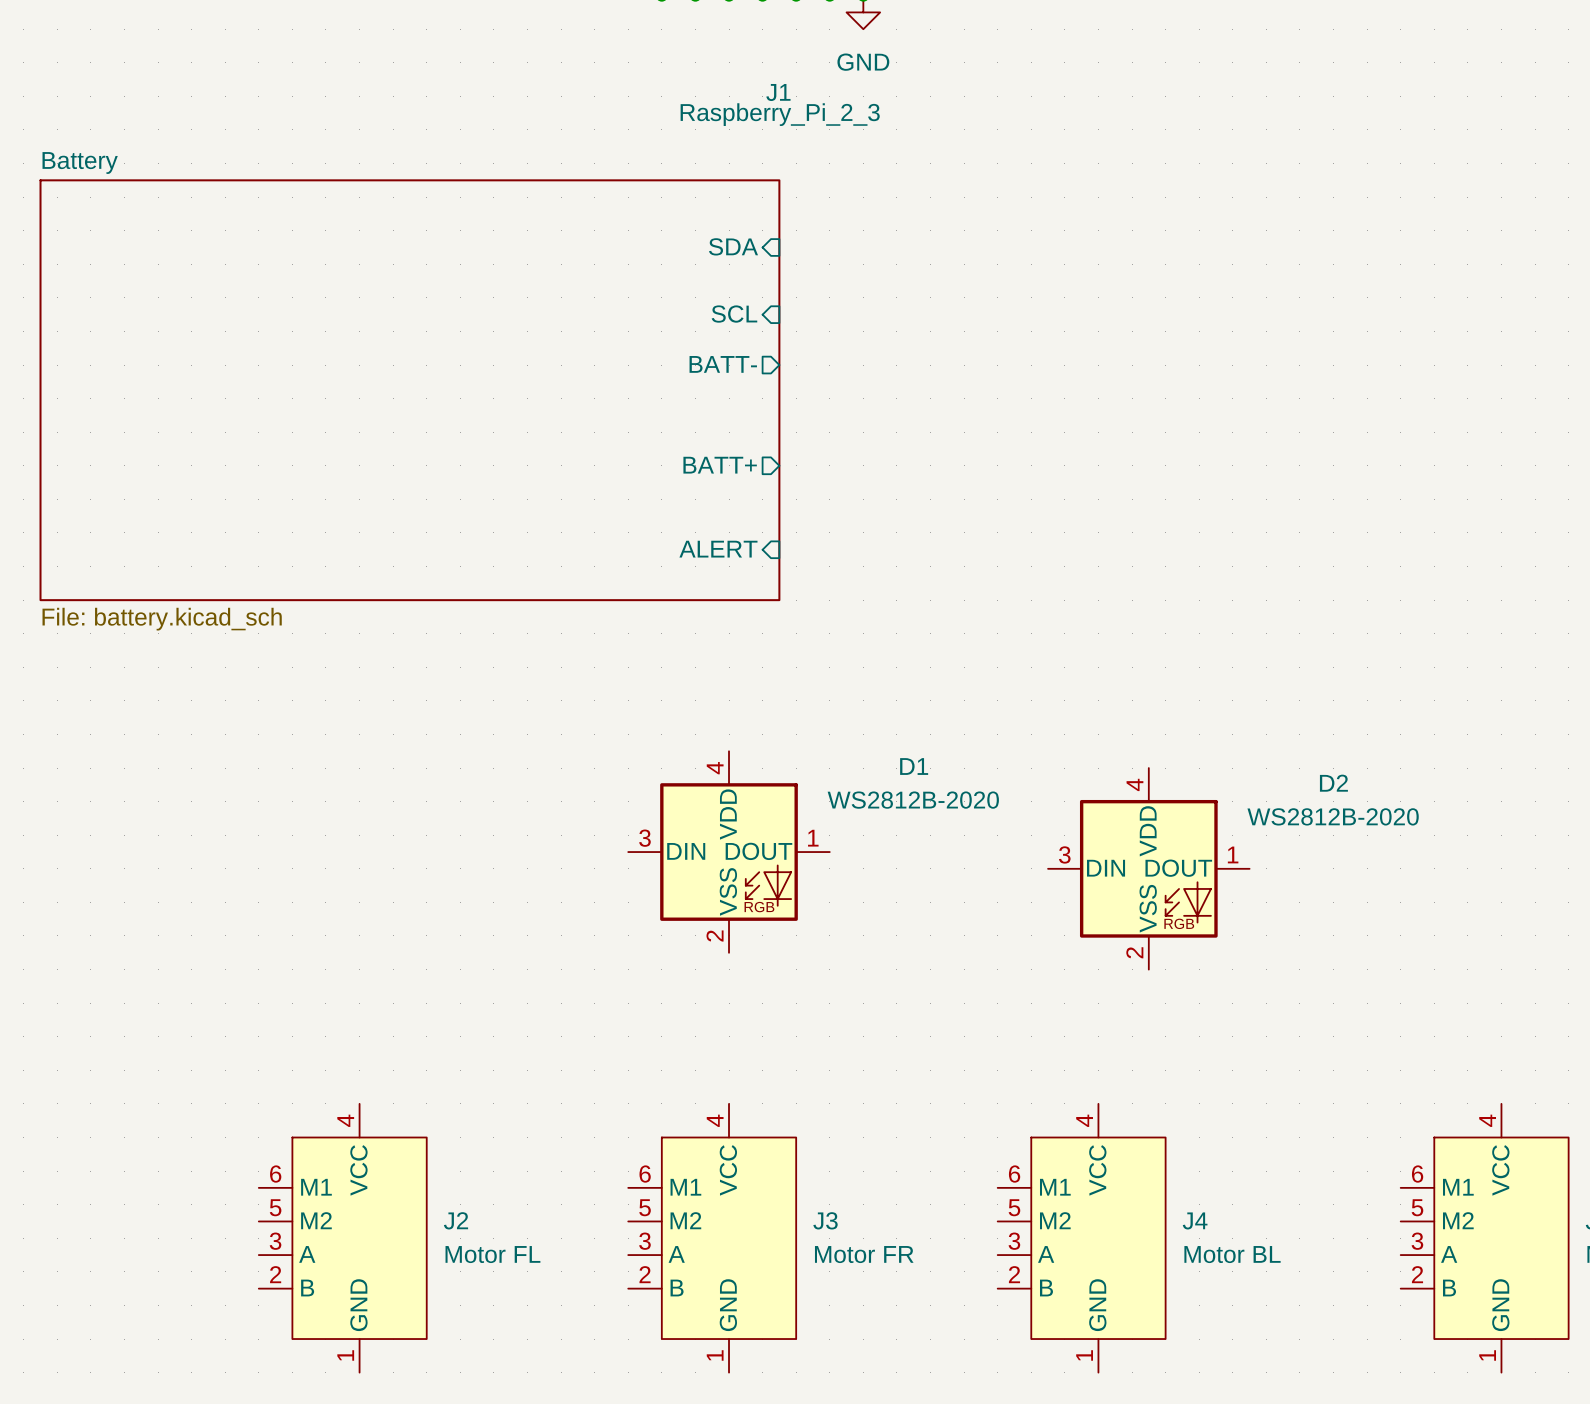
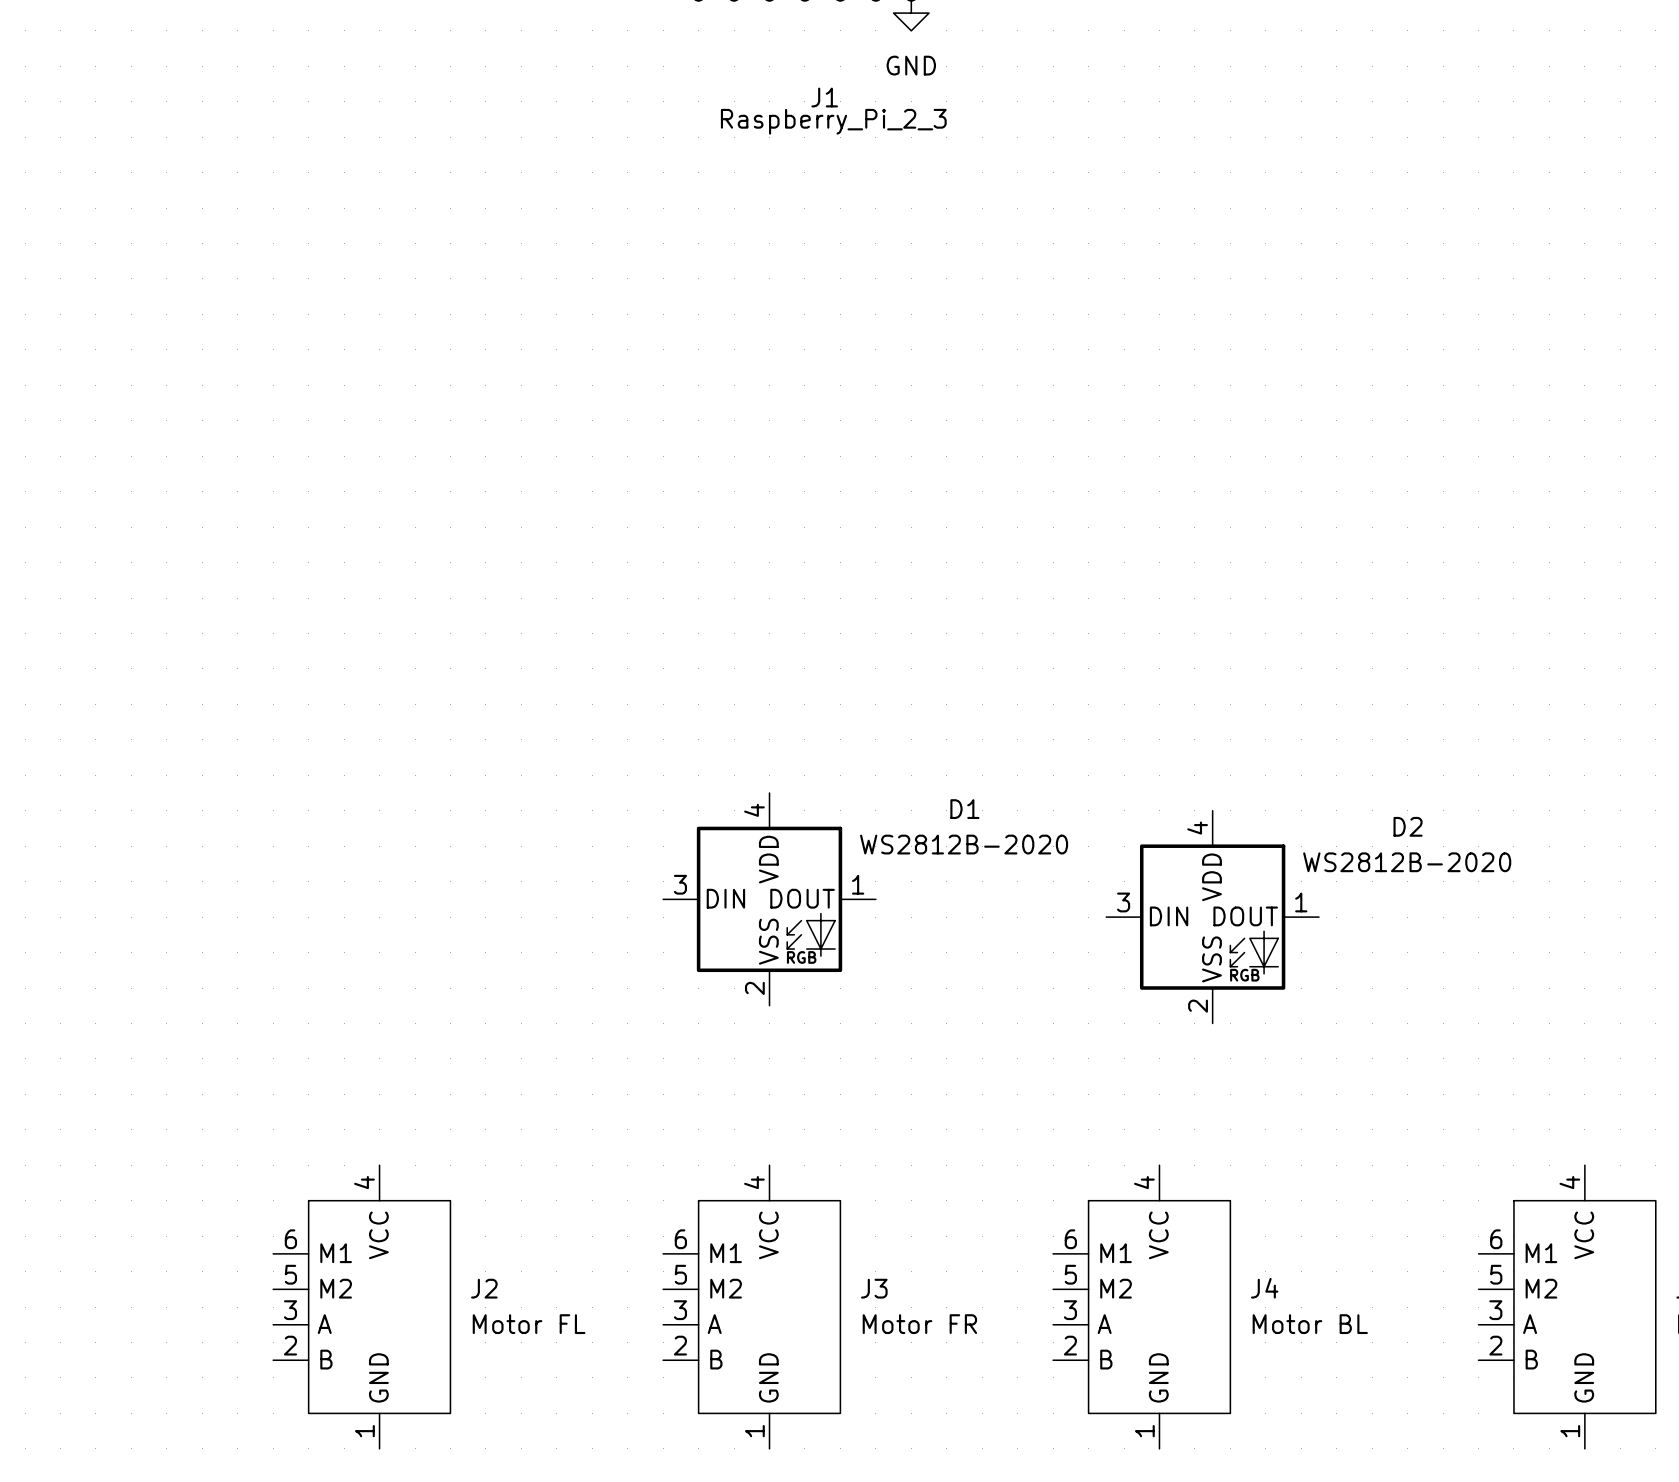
sheet pin: SDA (733, 246) -> none
sheet pin: SCL (734, 314) -> none
sheet pin: BATT- (723, 364) -> none
sheet Battery: File: battery.kicad_sch (409, 390) -> none
sheet pin: BATT+ (720, 465) -> none
sheet pin: ALERT (718, 549) -> none

